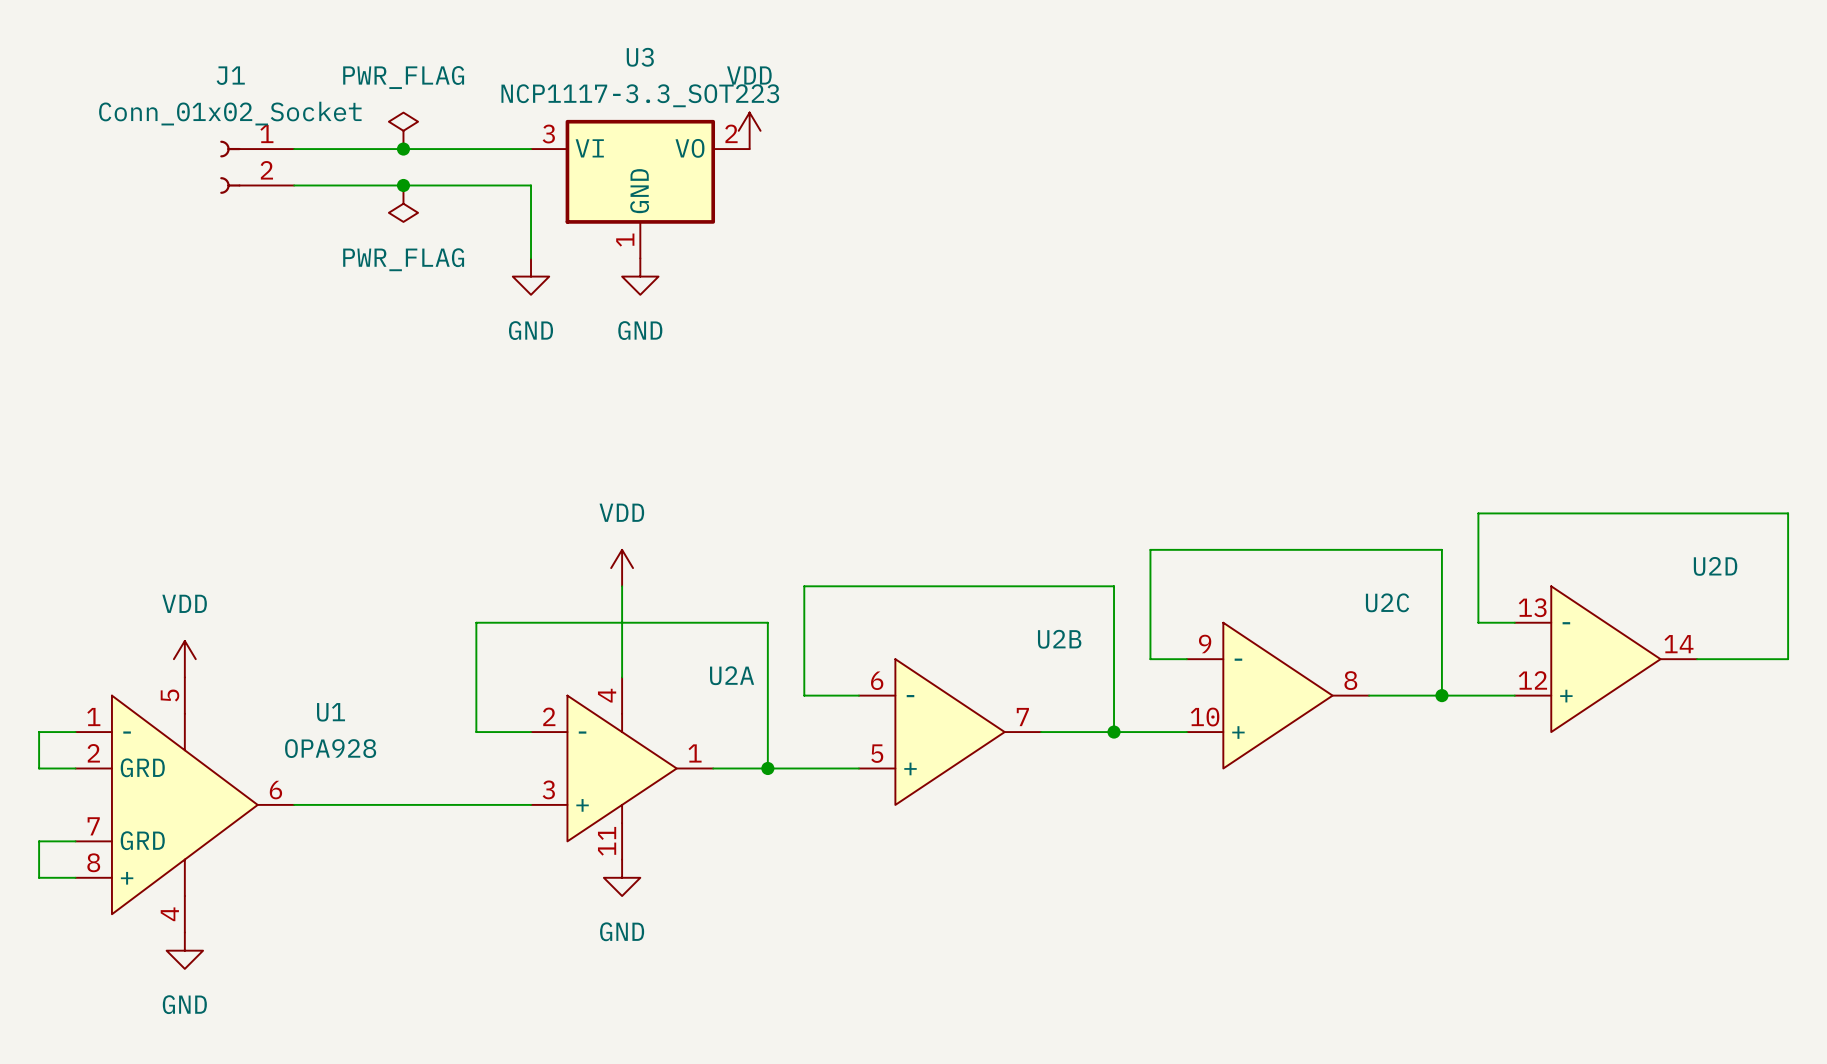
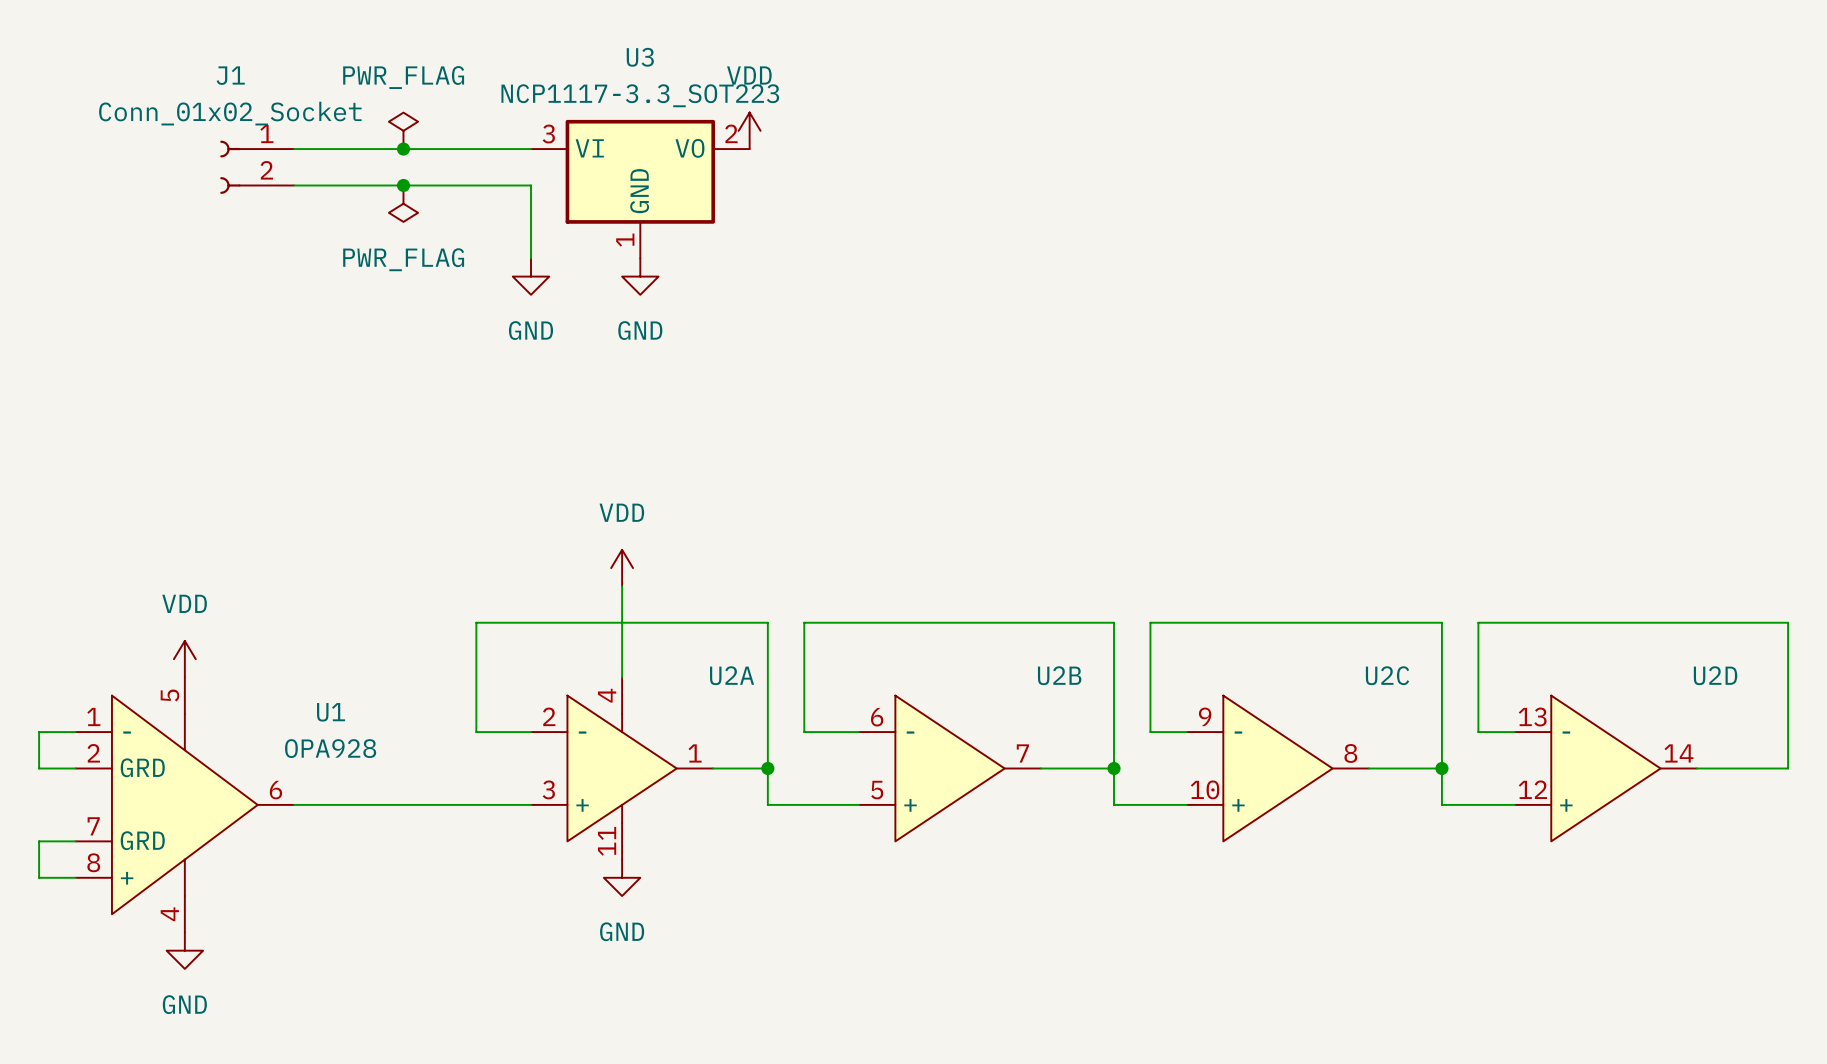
wire: (804, 622) (804, 586) (1114, 586) (1114, 622) -> (804, 622) (1114, 622)
wire: (1150, 622) (1150, 549) (1441, 549) (1441, 622) -> (1150, 622) (1441, 622)
wire: (1478, 622) (1478, 513) (1788, 513) (1788, 622) -> (1514, 622) (1788, 622)
wire: none -> (1478, 622) (1478, 732) (1514, 732)
wire: (1150, 659) (1186, 659) -> (1150, 659) (1150, 732)
U2D position: (1605, 659) -> (1605, 768)
wire: (1697, 659) (1788, 659) -> (1697, 768) (1788, 768) (1788, 659)
wire: (804, 695) (858, 695) -> (804, 695) (804, 732) (858, 732)
U2C position: (1277, 695) -> (1277, 768)
wire: (1369, 695) (1514, 695) -> none
wire: none -> (1441, 695) (1441, 804) (1514, 804)
junction position: (1441, 695) -> (1441, 768)
U2B position: (950, 732) -> (950, 768)
wire: (1041, 732) (1150, 732) -> none
wire: none -> (1114, 732) (1114, 804) (1186, 804)
junction position: (1114, 732) -> (1114, 768)
wire: (767, 768) (858, 768) -> (767, 768) (767, 804) (858, 804)
wire: none -> (1041, 768) (1114, 768)
wire: none -> (1369, 768) (1441, 768)

